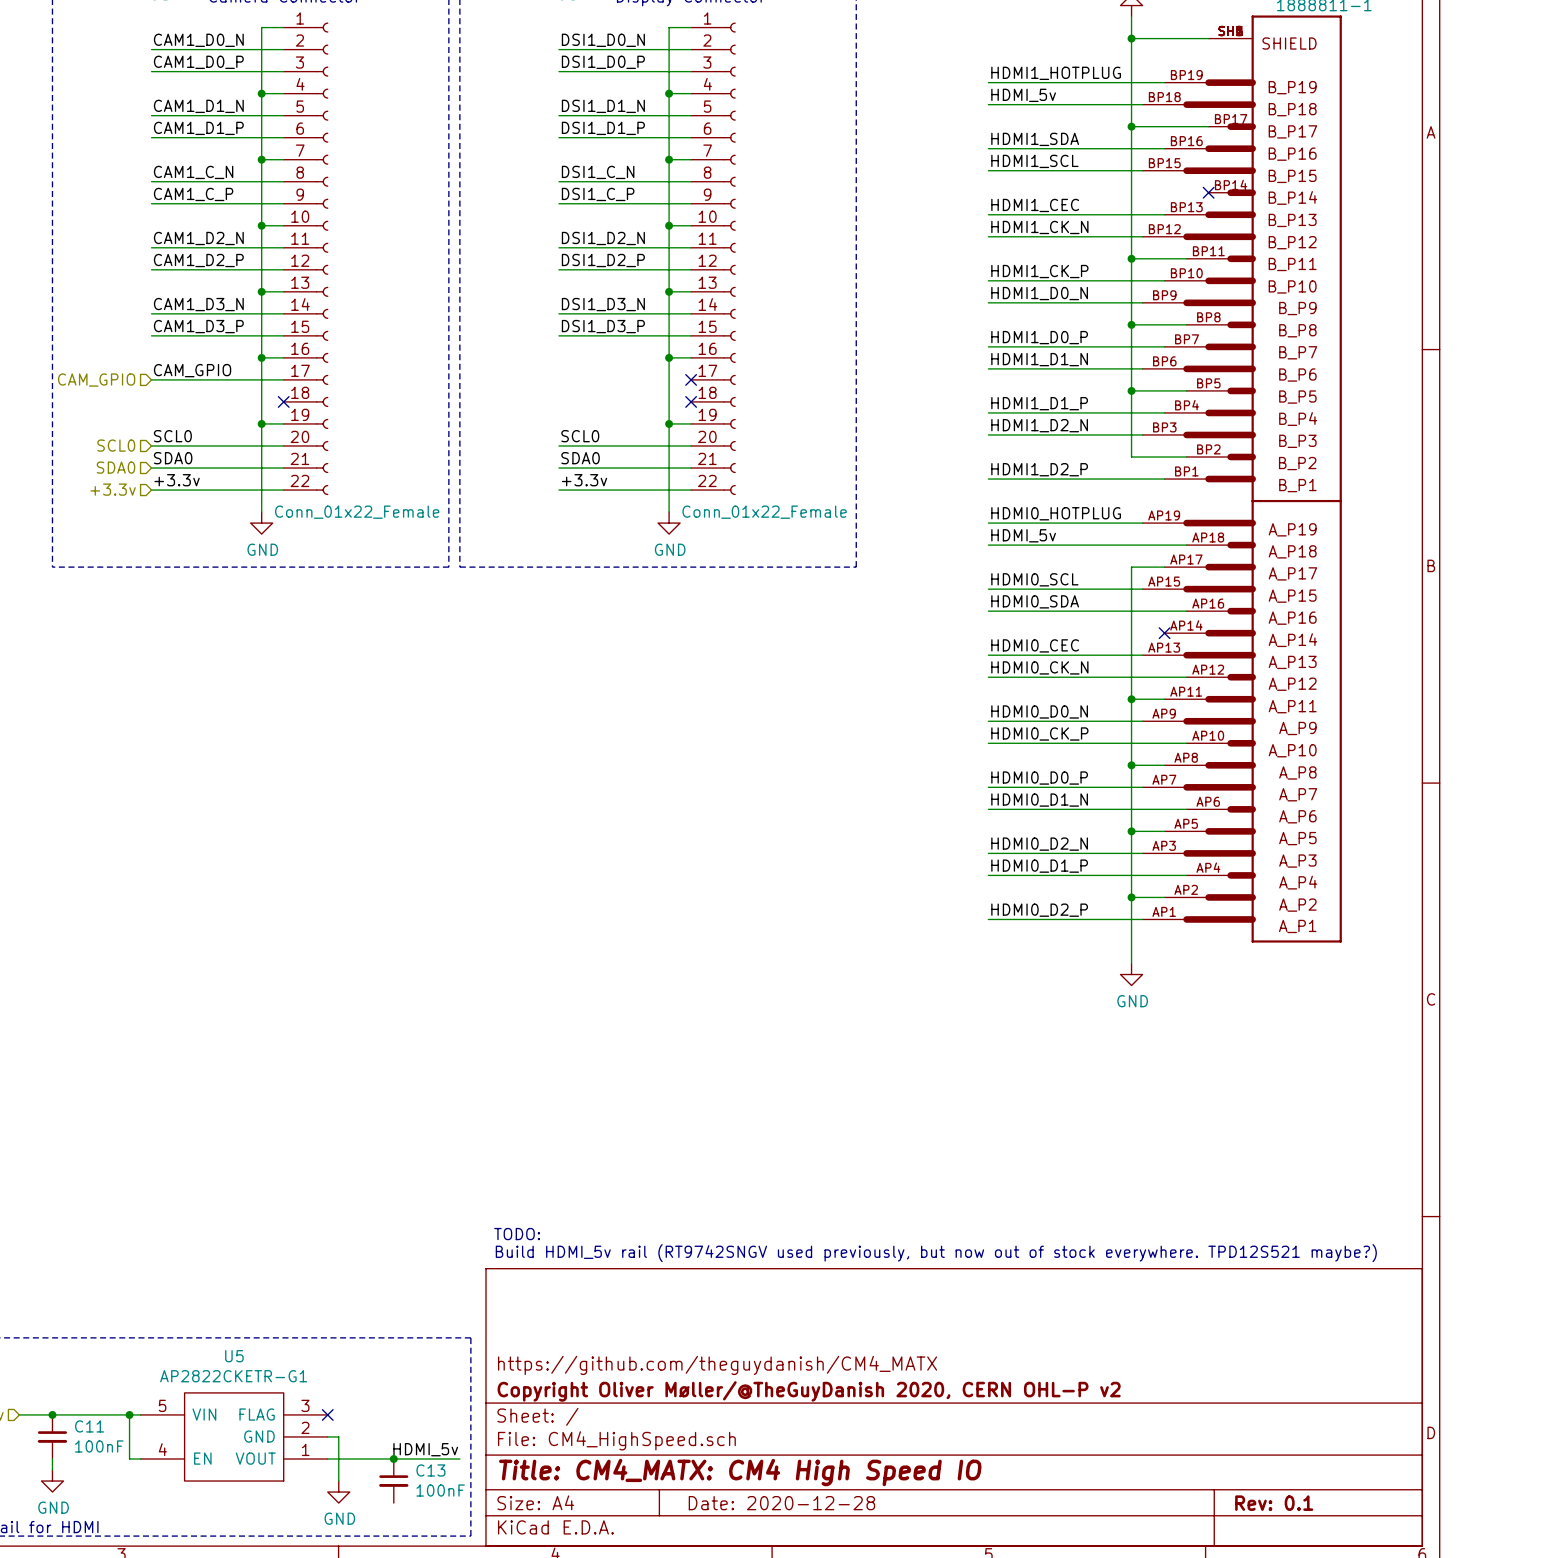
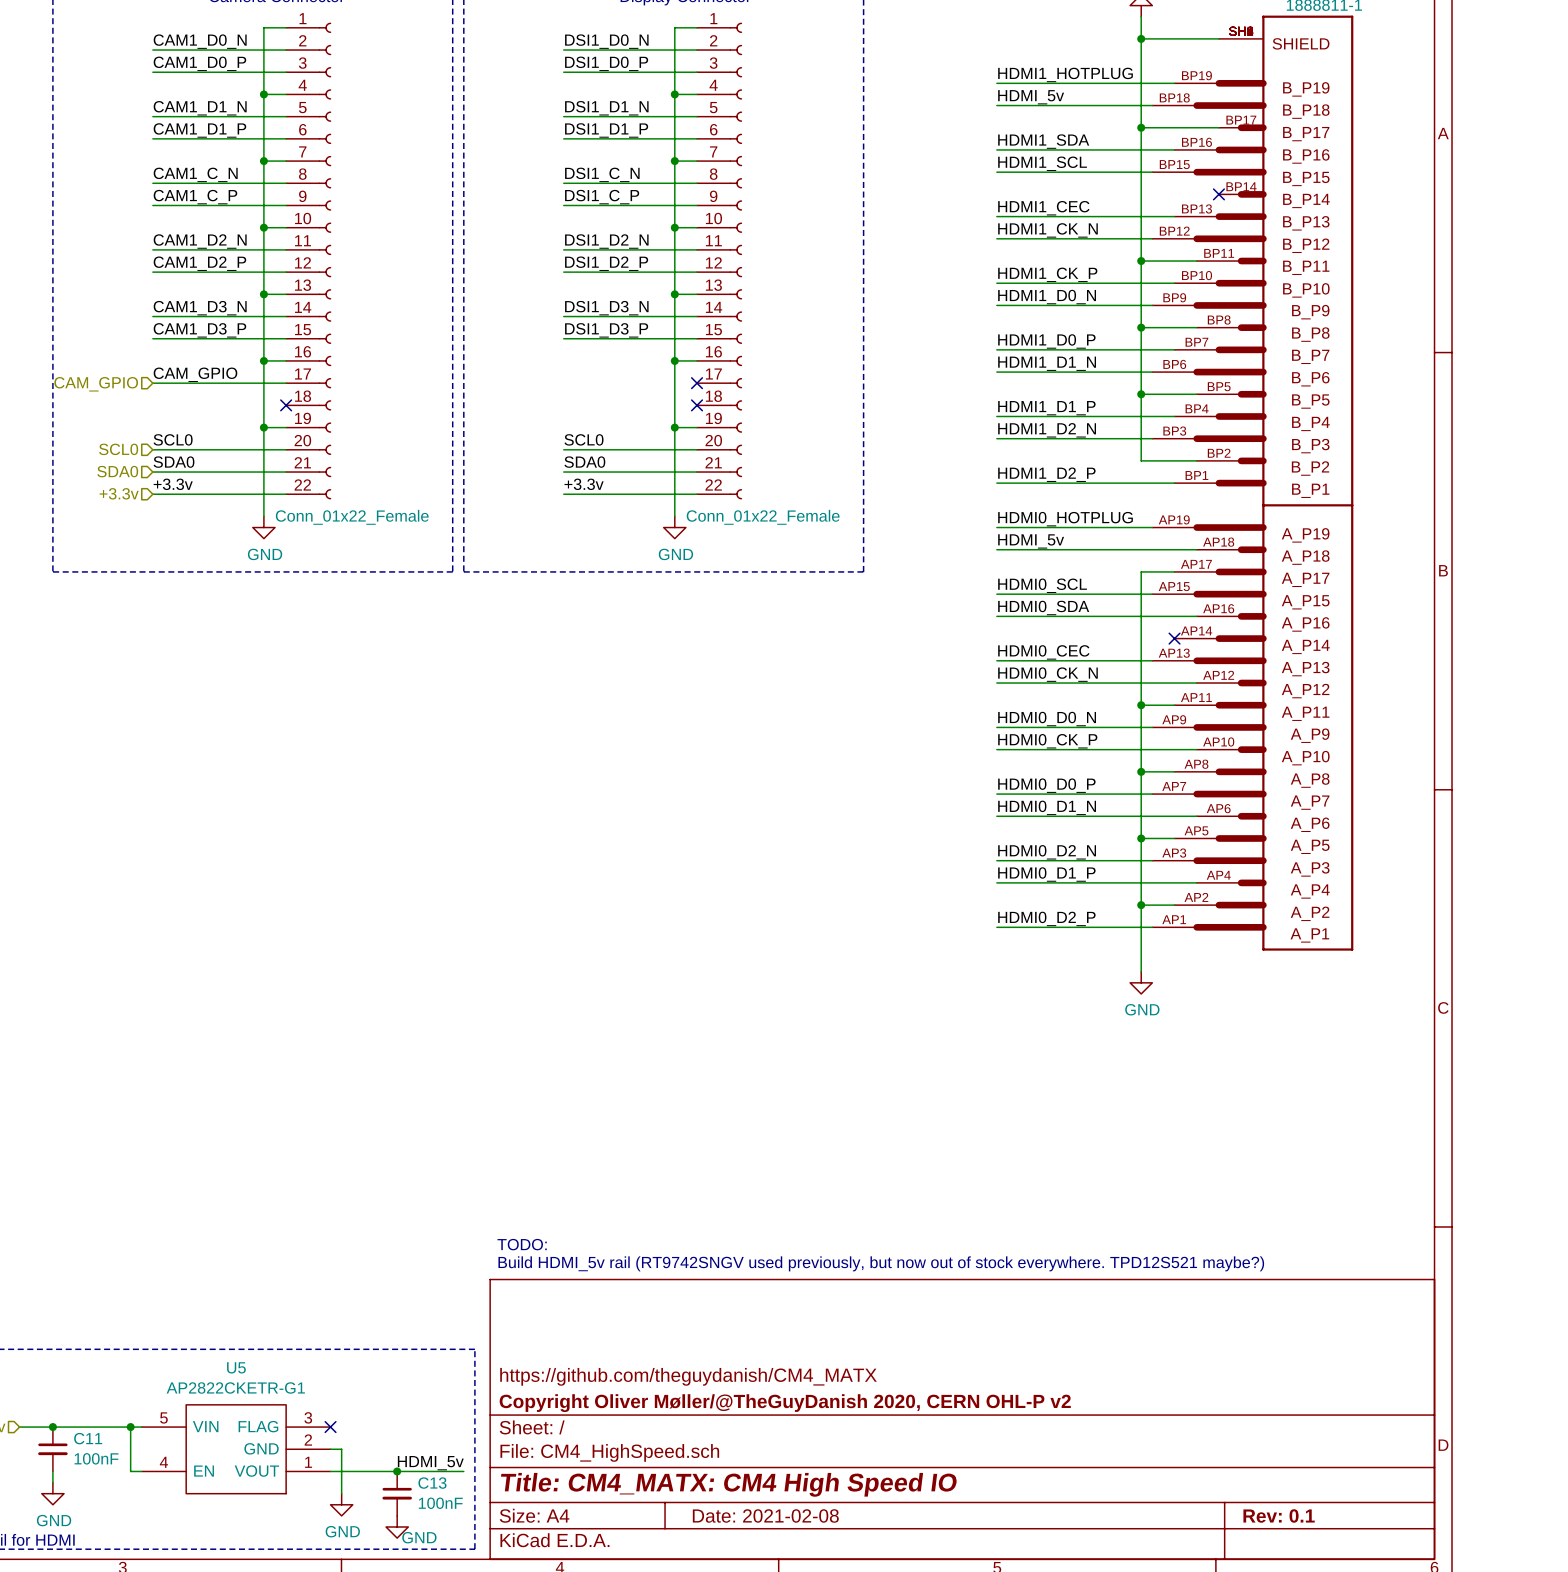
title block: Date: 2020-12-28 (781, 1503) -> Date: 2021-02-08 (765, 1515)
power symbol: none -> GND (397, 1527)

